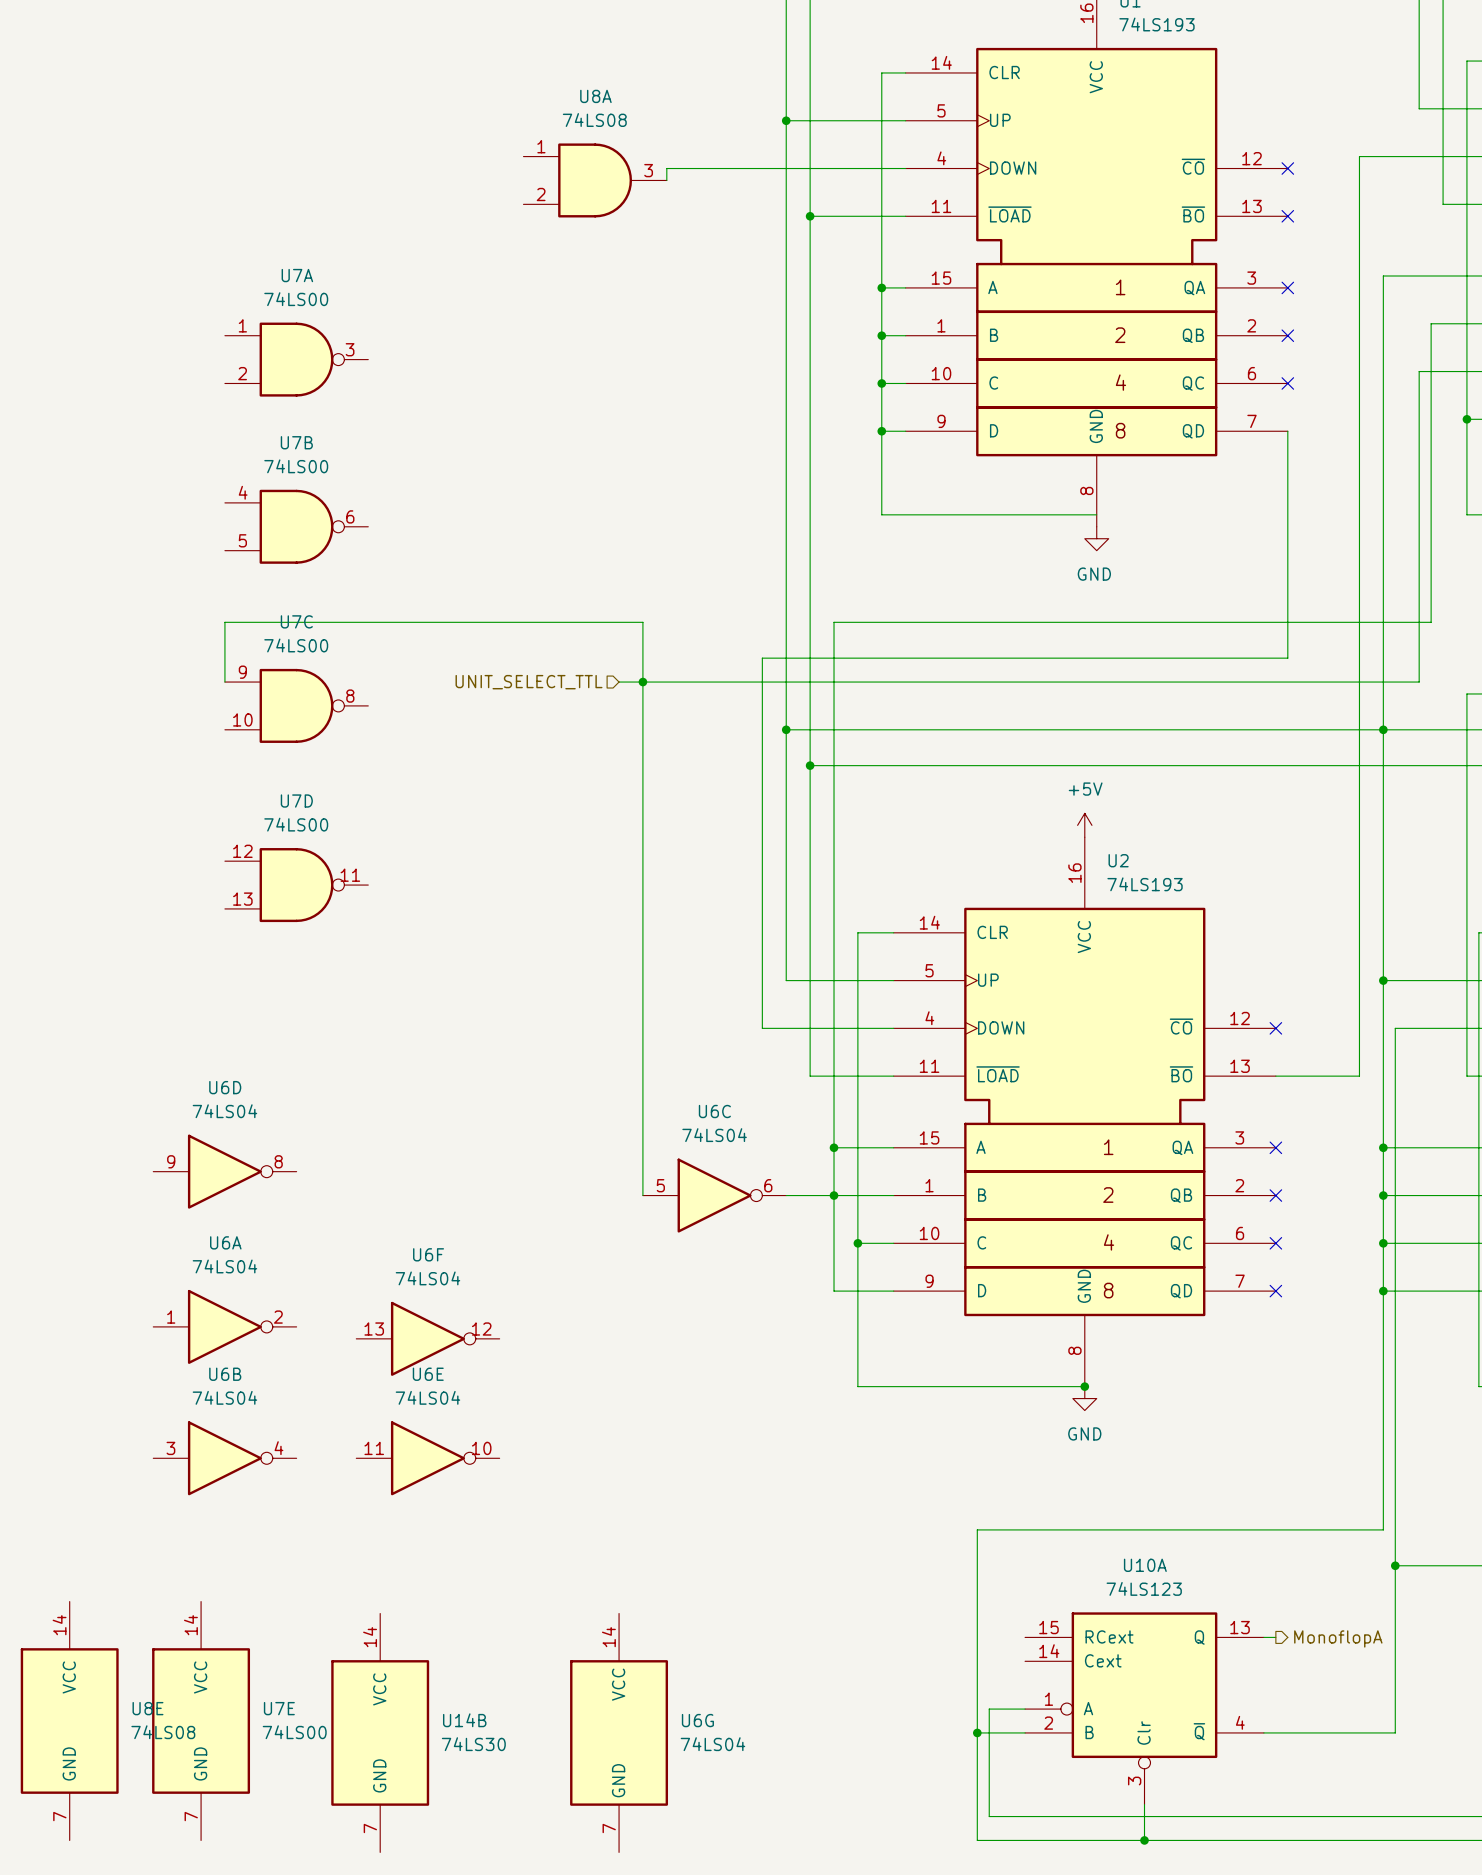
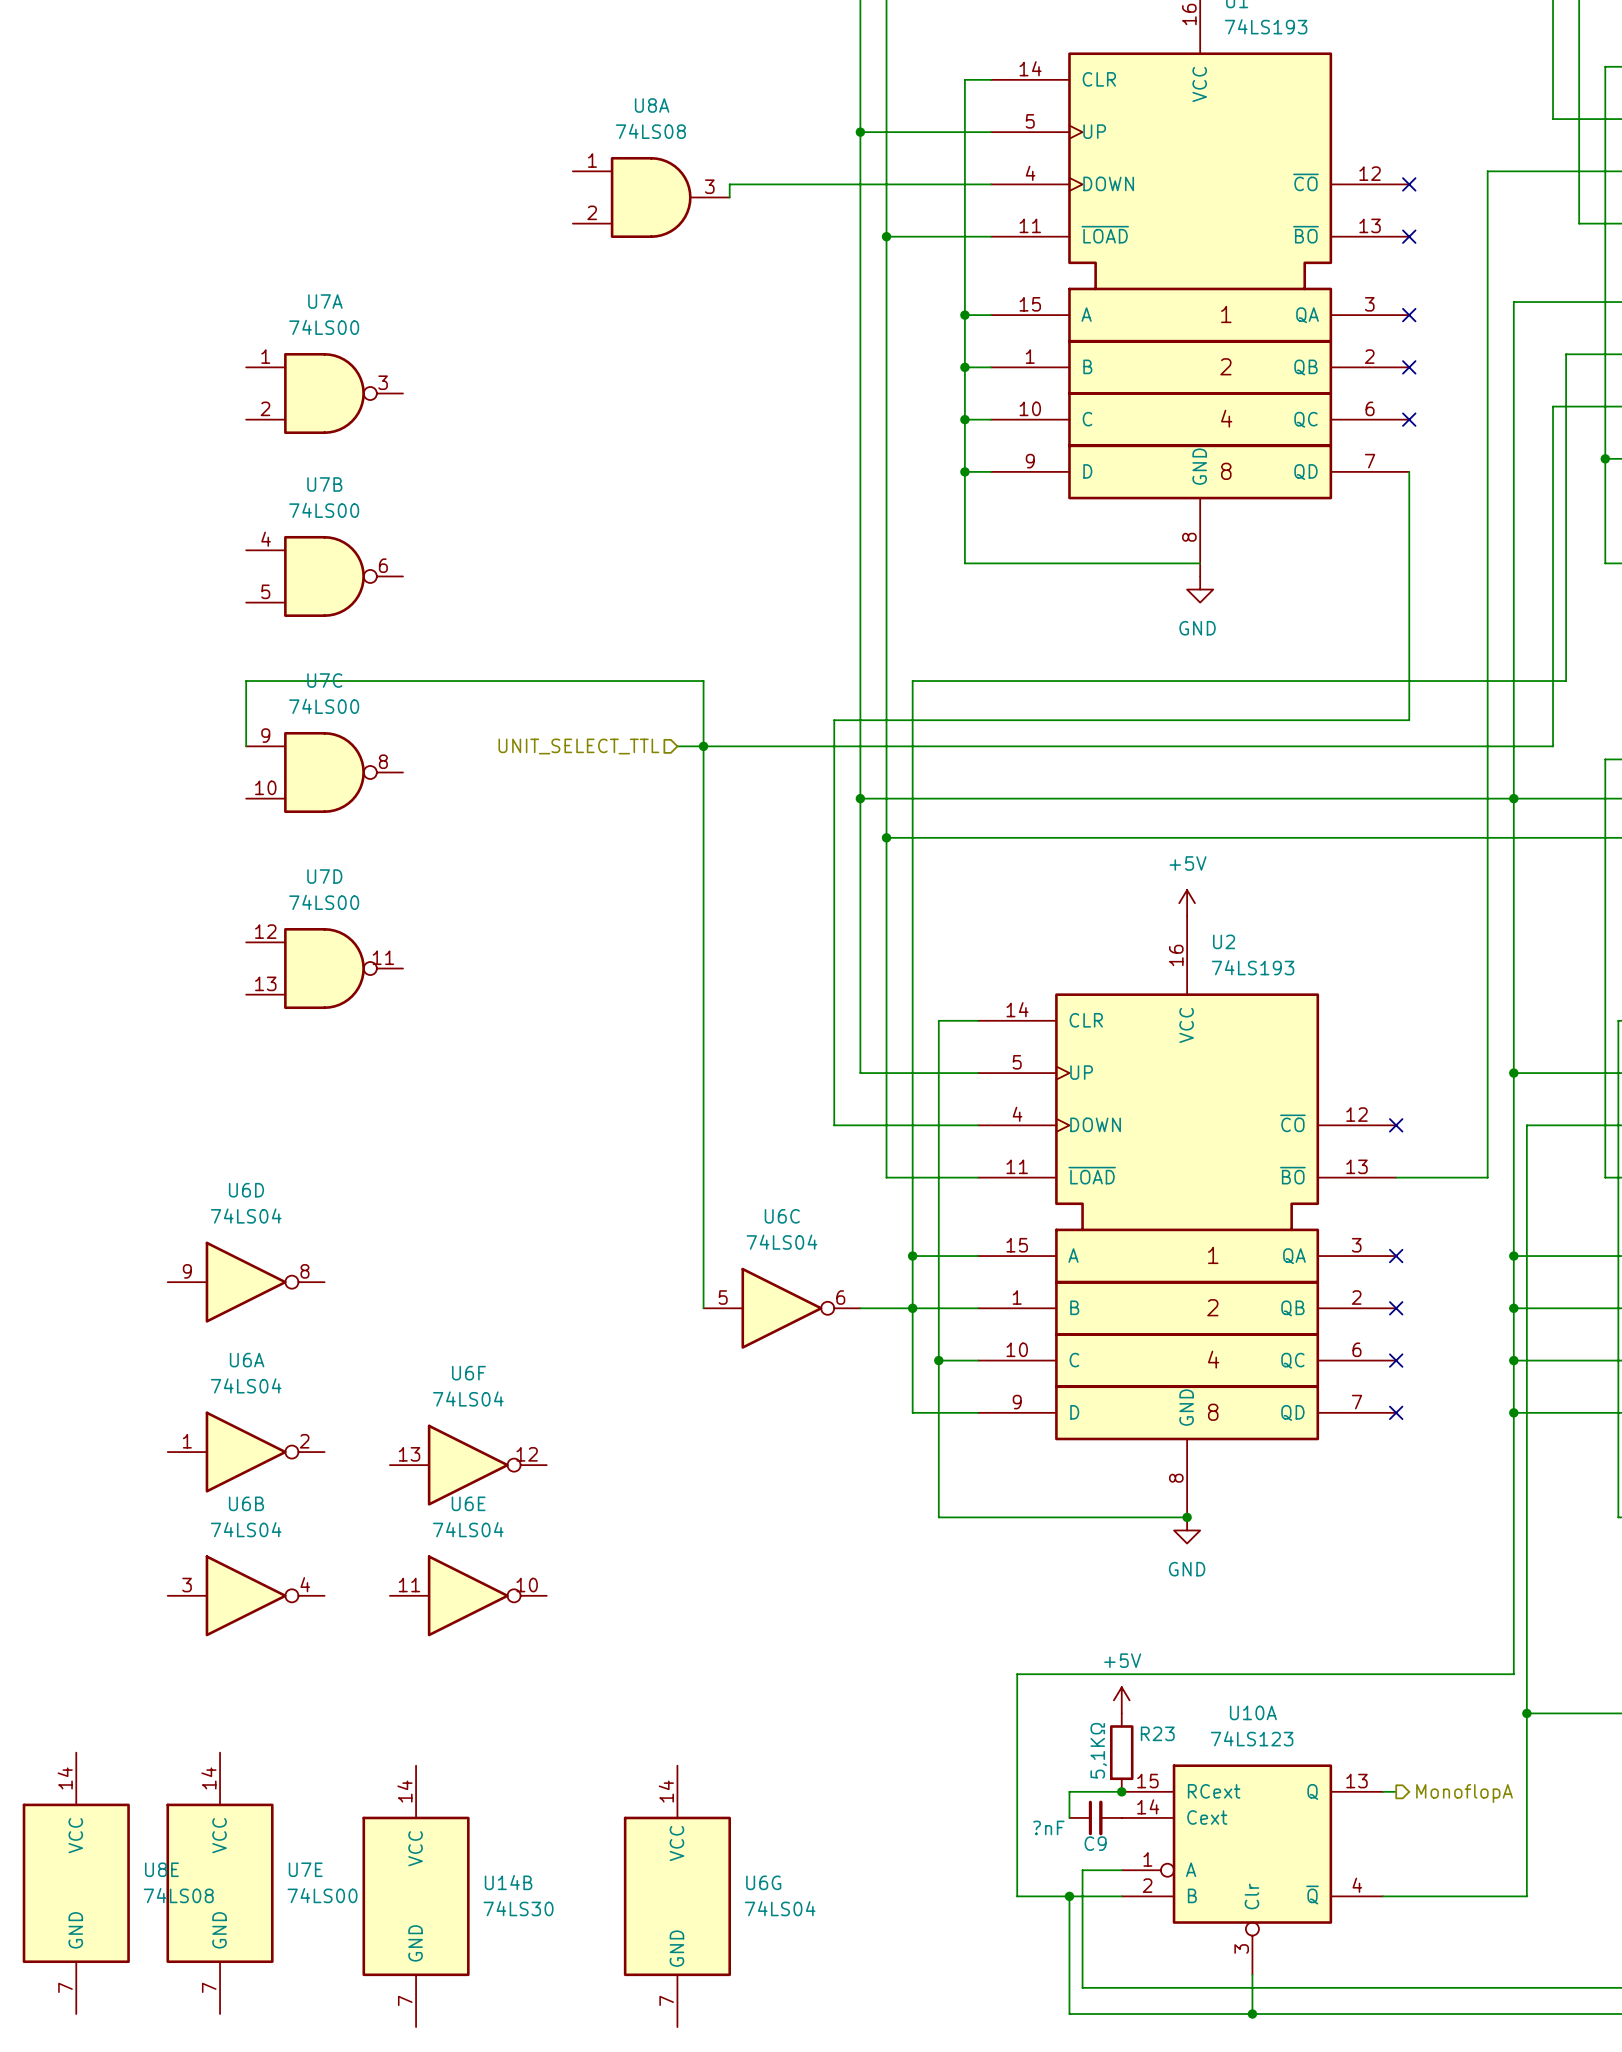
wire: (977, 1529) (977, 1637) -> (1069, 1674) (1017, 1674) (1017, 1896) (1069, 1896)
power symbol: none -> +5V (1121, 1700)
R23: none -> 5,1KΩ (1121, 1752)
wire: none -> (1069, 1791) (1121, 1791)
junction: none -> (1121, 1791)
wire: (977, 1661) (977, 1732) -> none
C9: none -> ?nF (1095, 1817)

